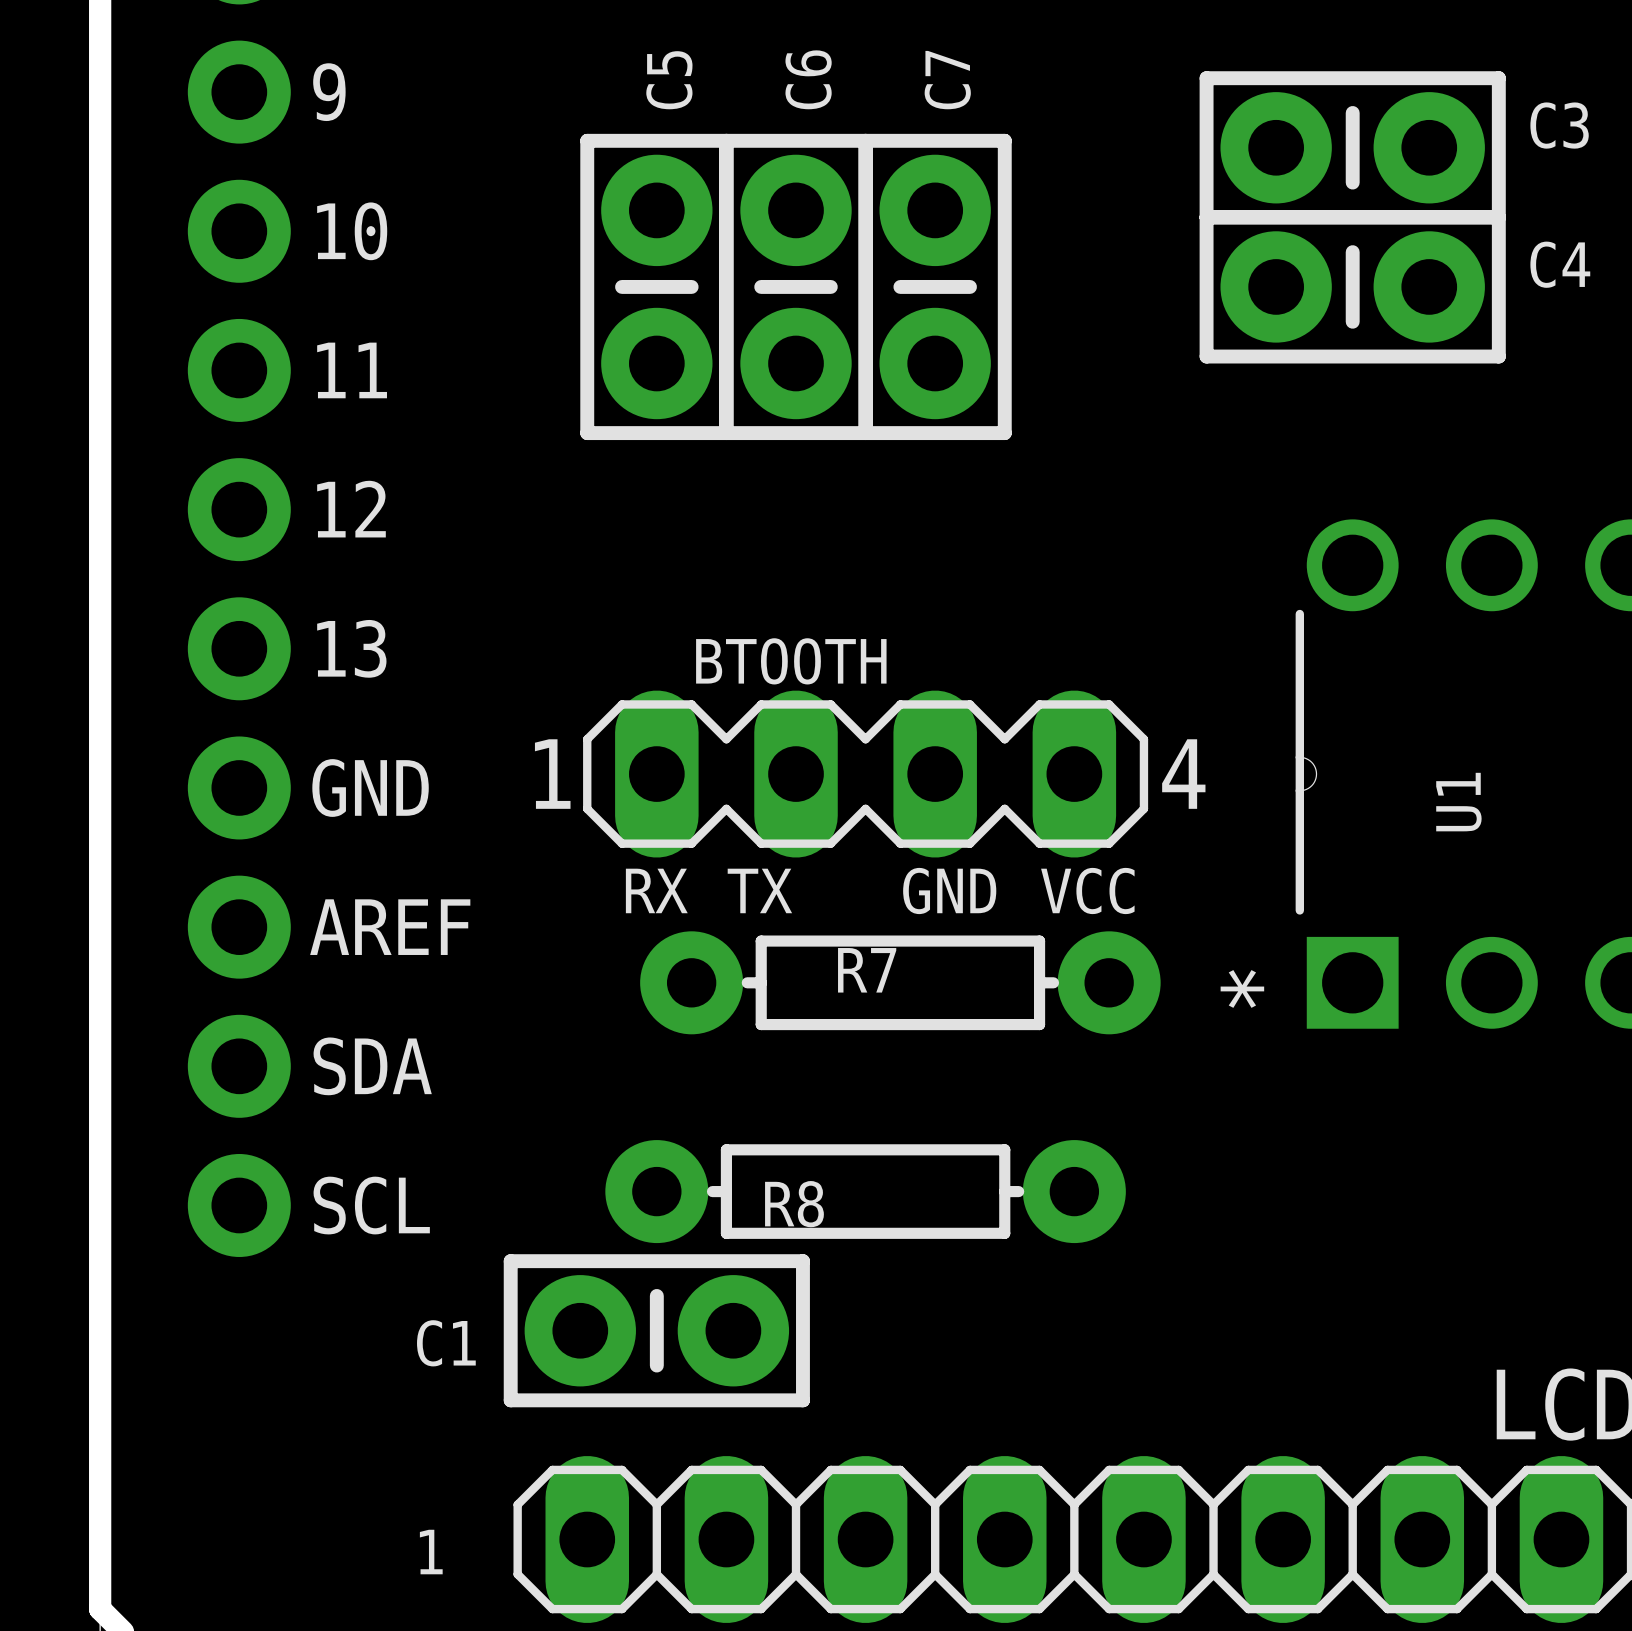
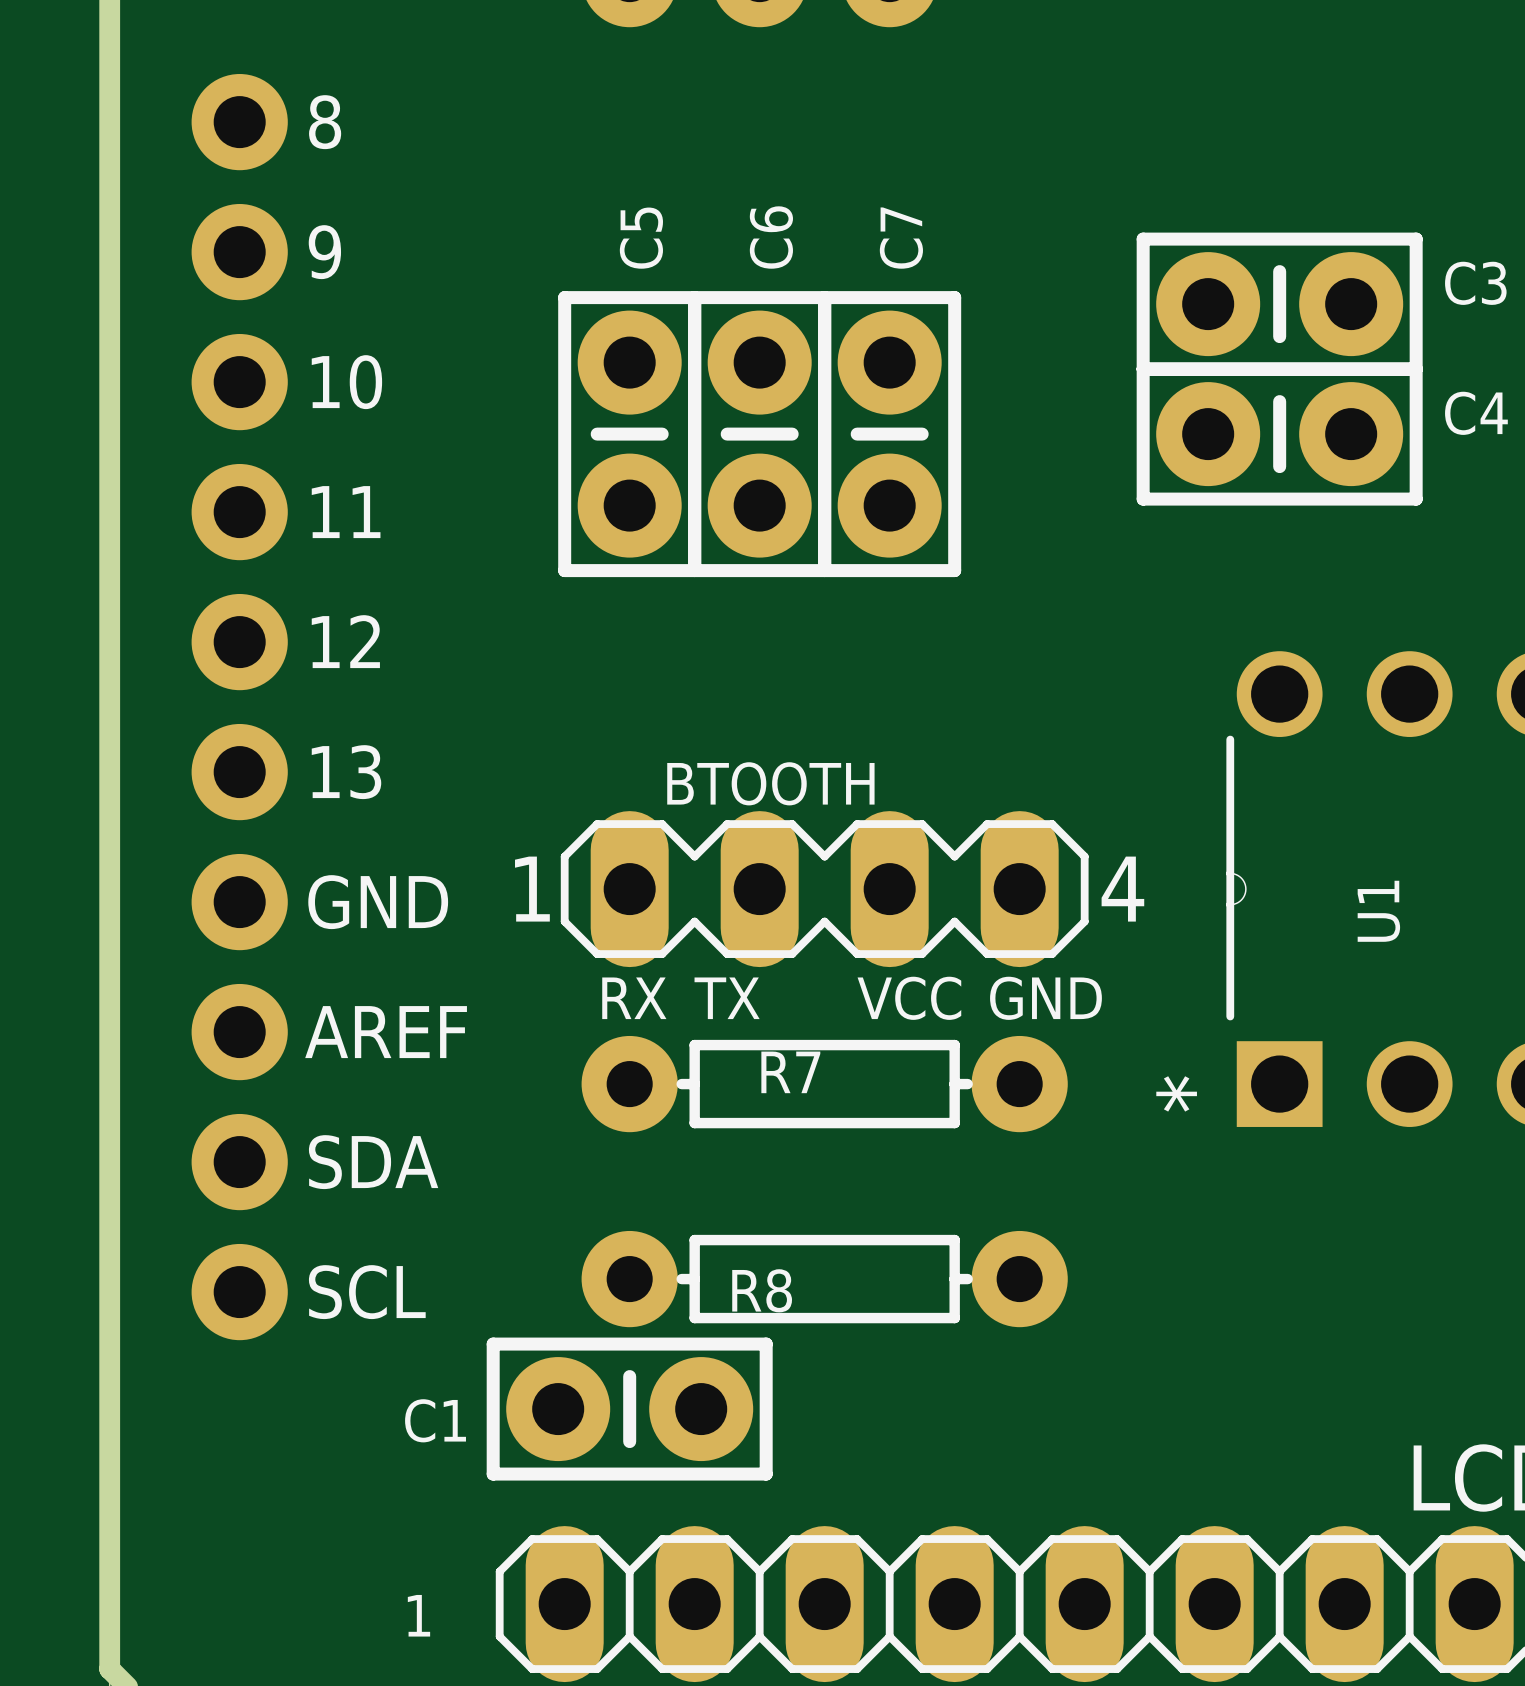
text: GND (949, 890) -> VCC (909, 998)
text: VCC (1087, 890) -> GND (1045, 998)
R7 position: (900, 982) -> (824, 1084)

